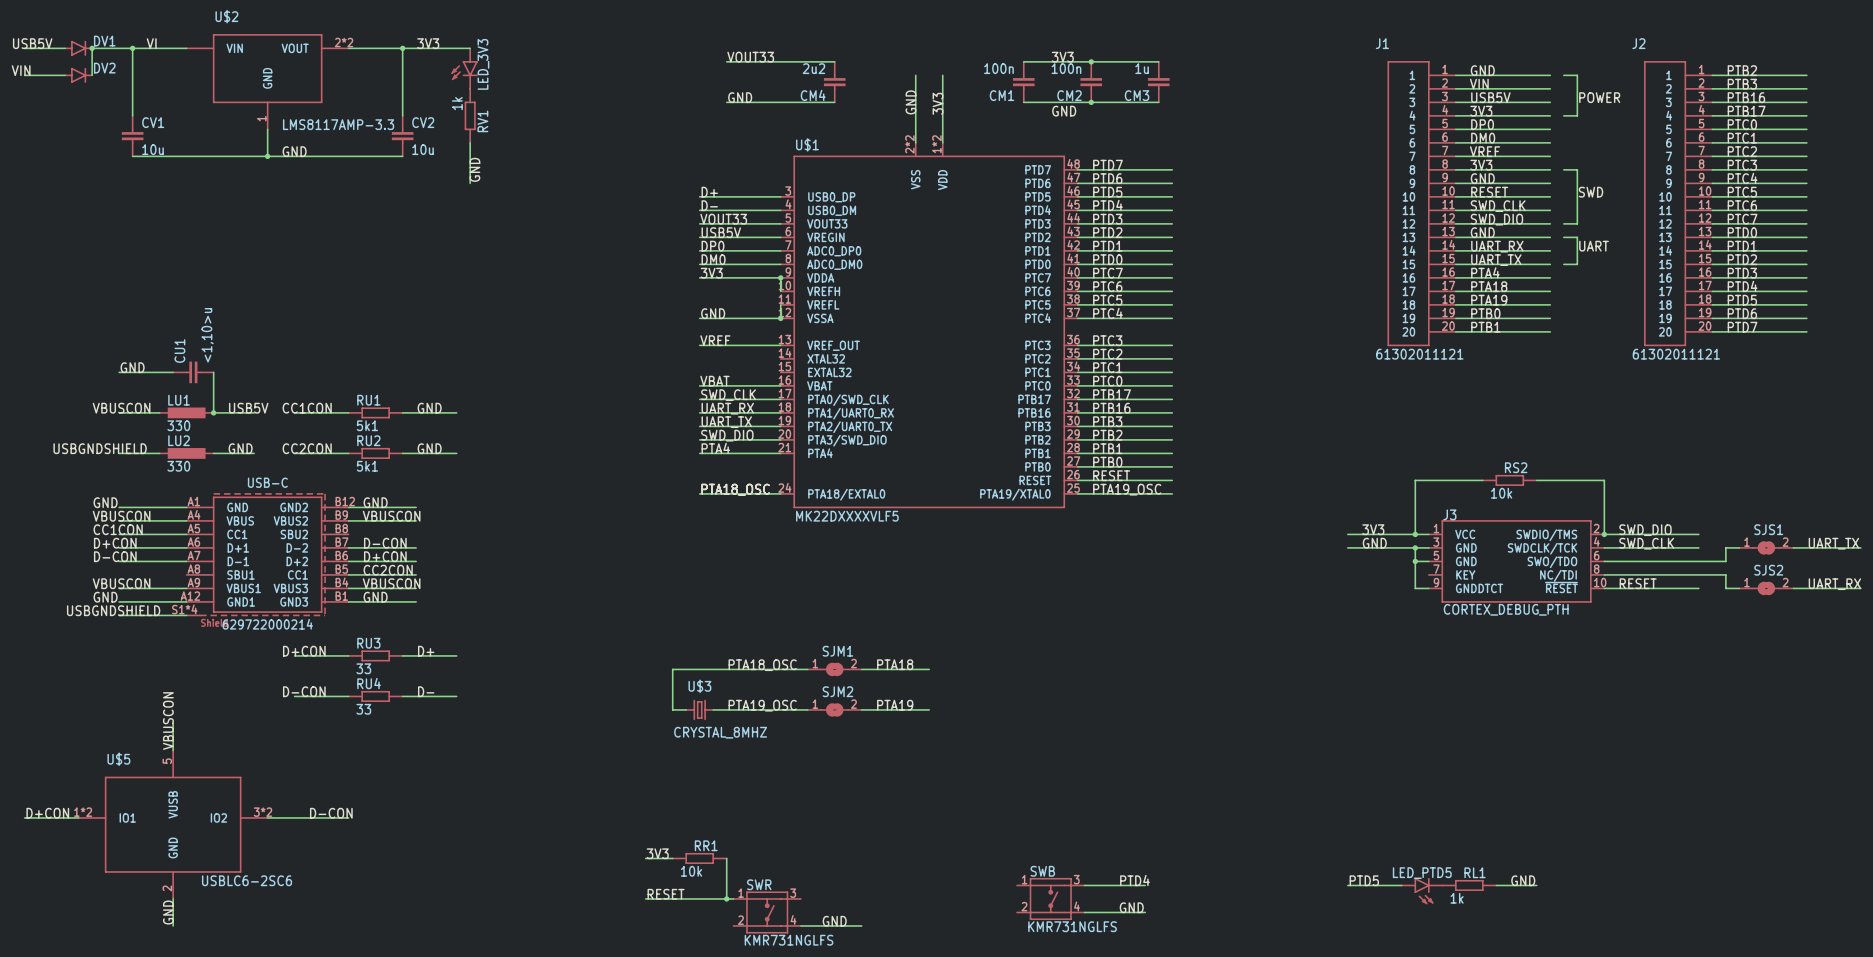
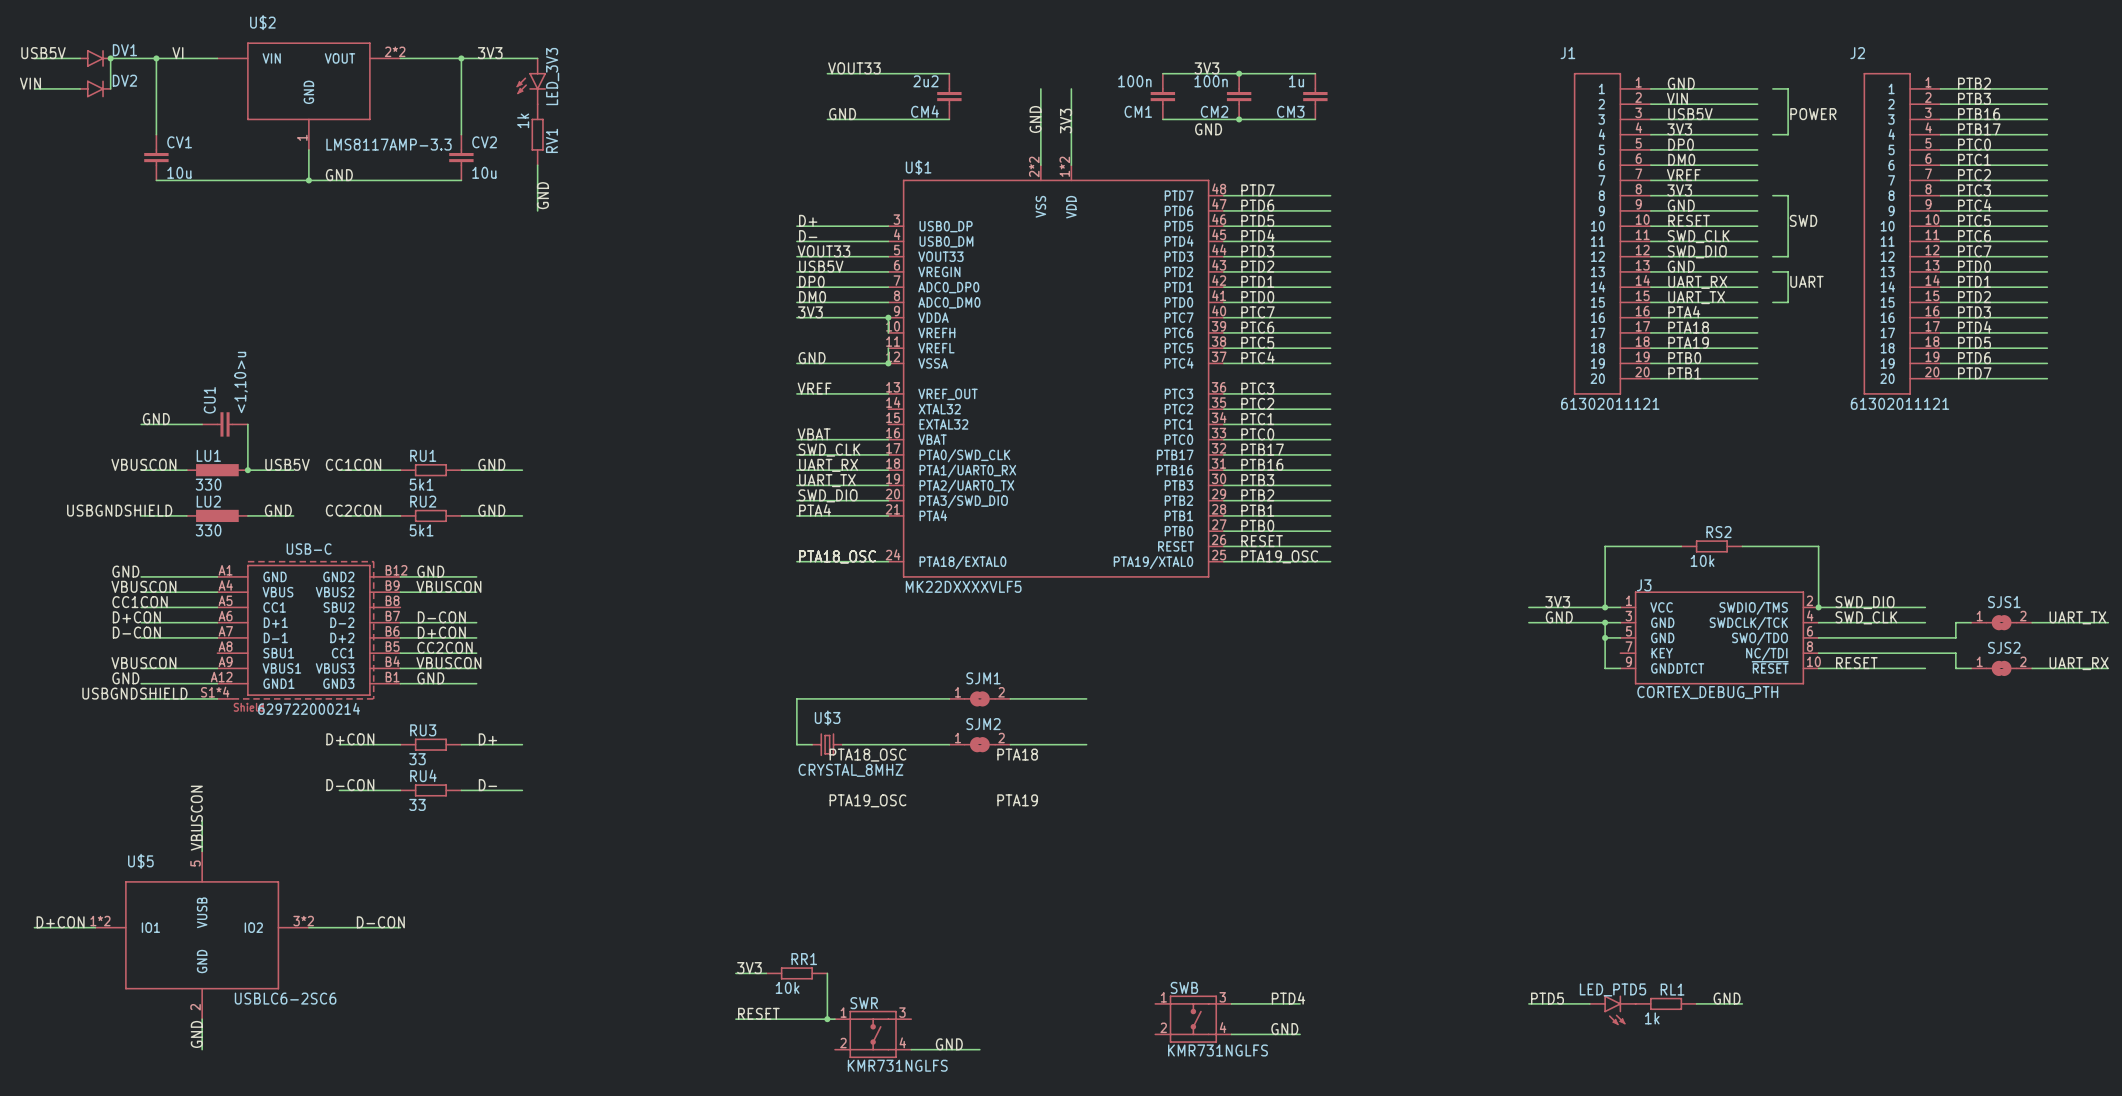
wire: (807, 669) (672, 669) (672, 709) (686, 709) -> (949, 698) (796, 698) (796, 744) (812, 744)
SJM1 position: (834, 669) -> (979, 698)
wire: (861, 669) (929, 669) -> (1010, 698) (1086, 698)
U$3 position: (699, 709) -> (827, 744)
wire: (713, 709) (807, 709) -> (842, 744) (949, 744)
SJM2 position: (834, 709) -> (979, 744)
wire: (861, 709) (929, 709) -> (1010, 744) (1086, 744)

